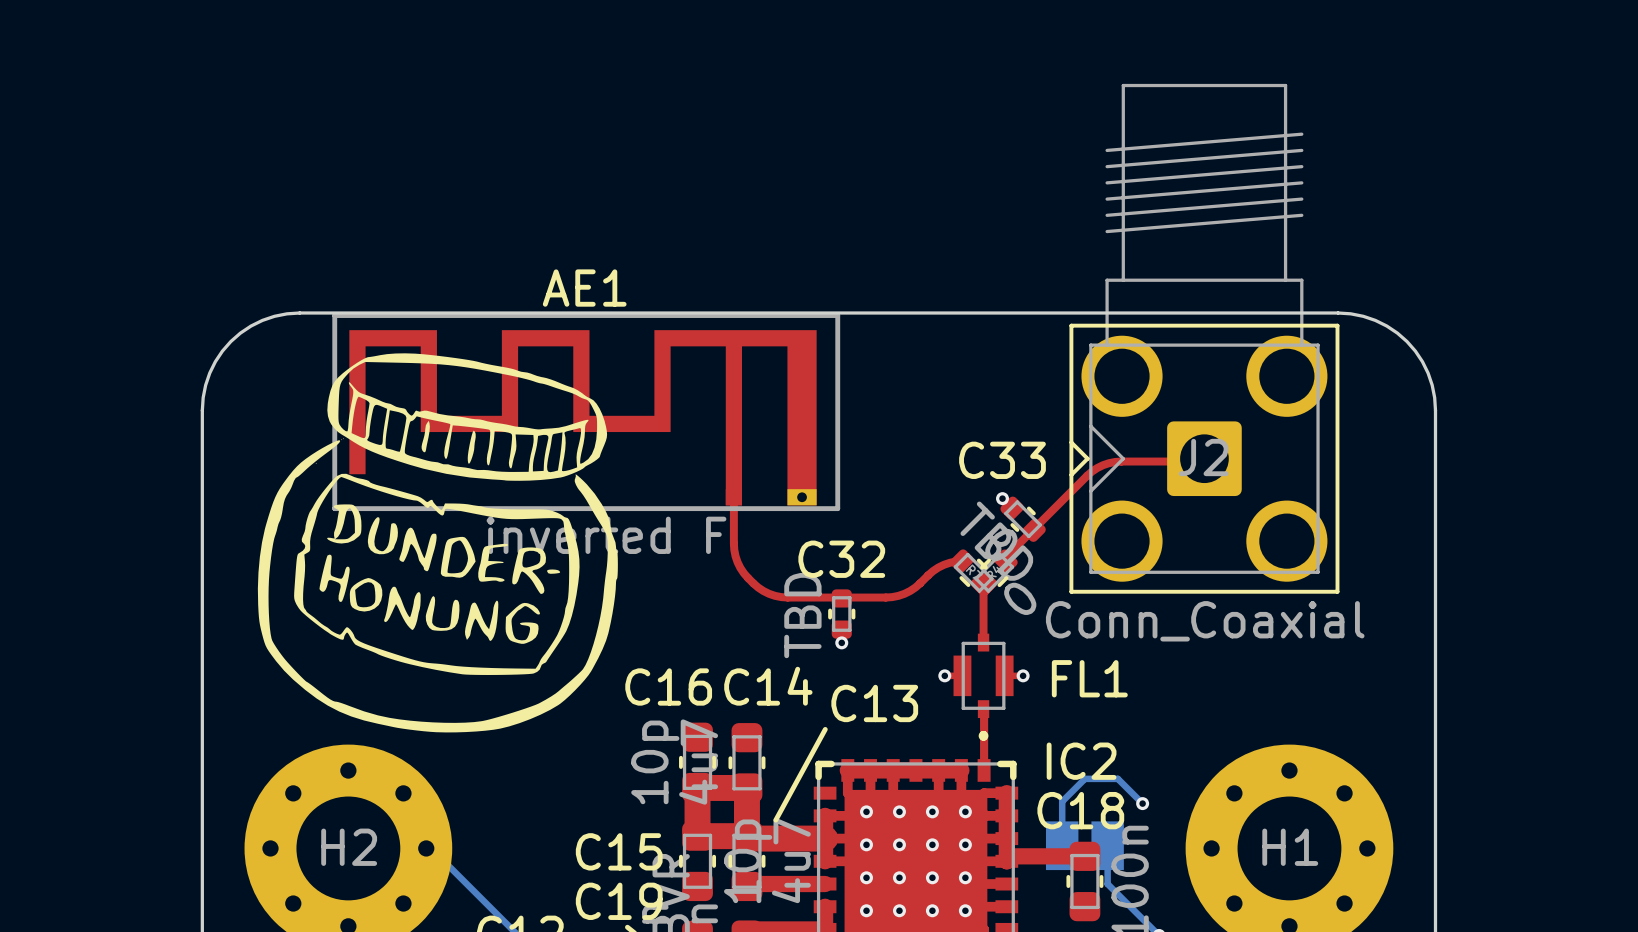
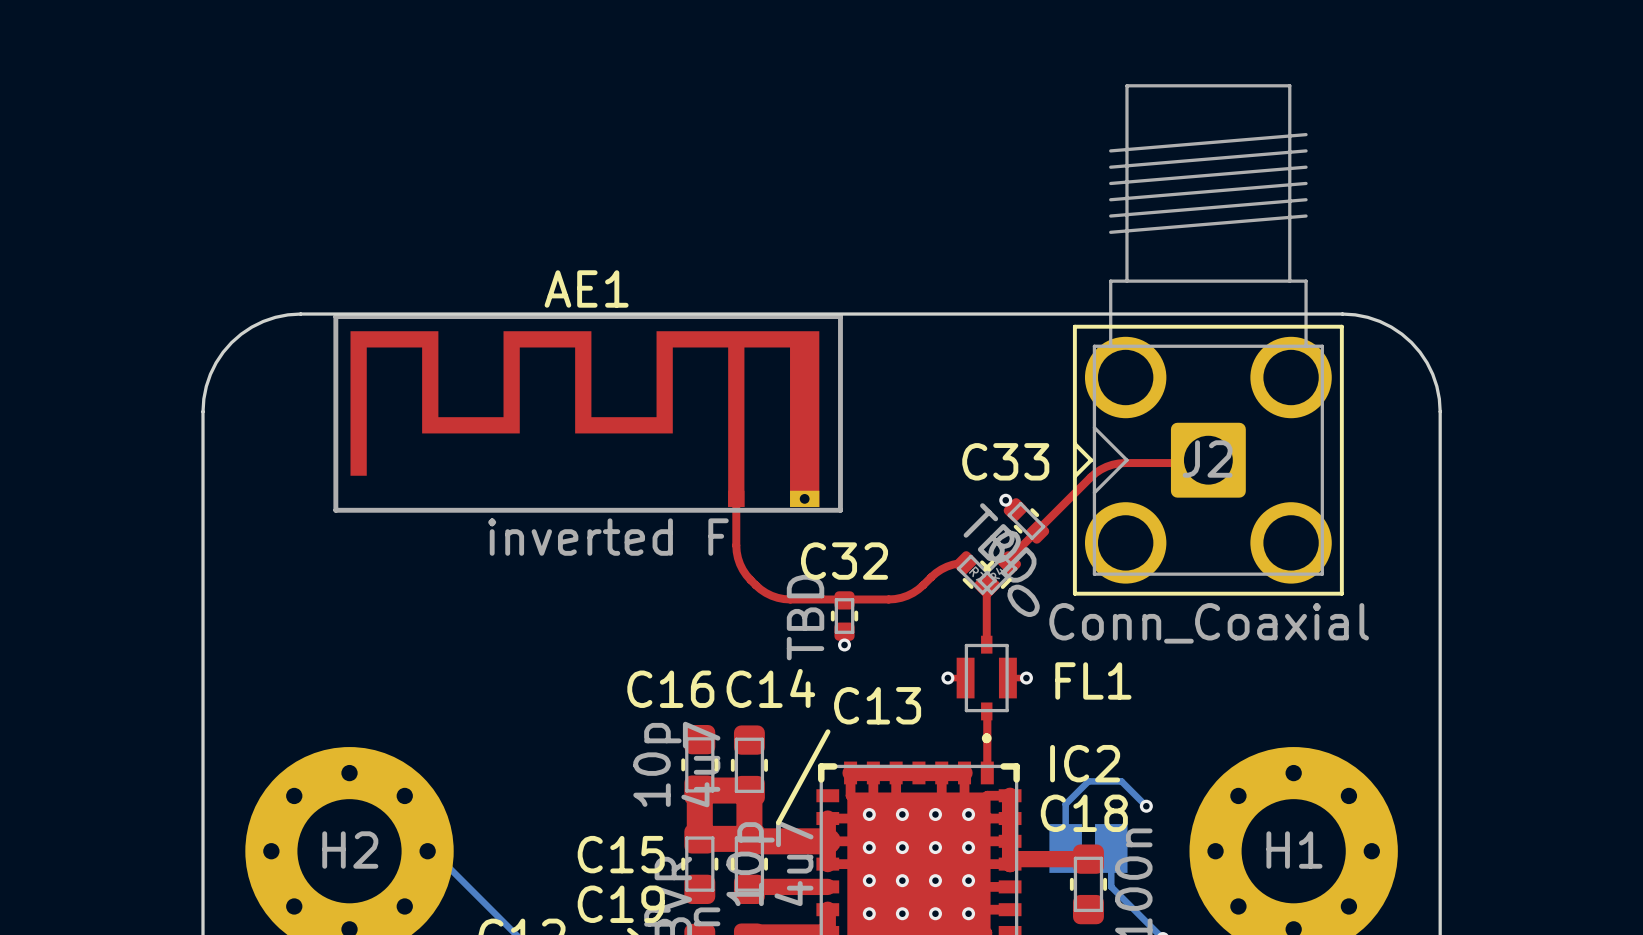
drawing: [257, 353, 618, 733] -> none

